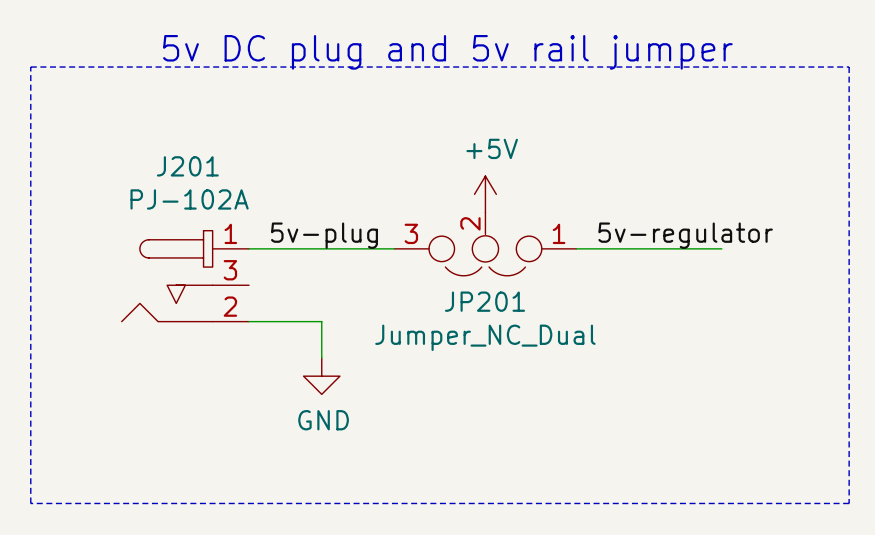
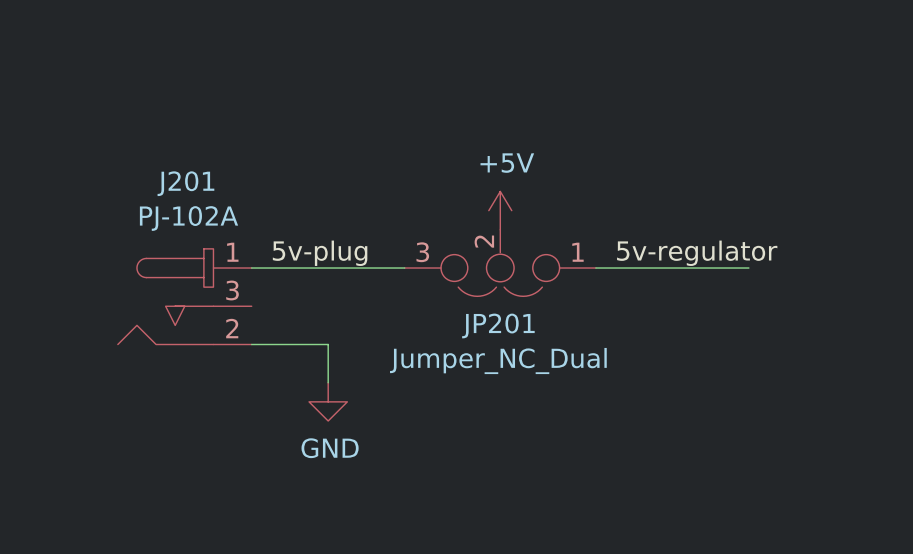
text: 5v DC plug and 5v rail jumper (447, 52) -> none
line: (30, 67) (849, 67) (849, 503) (30, 503) (30, 67) -> none

